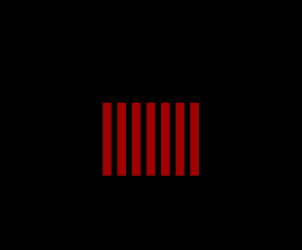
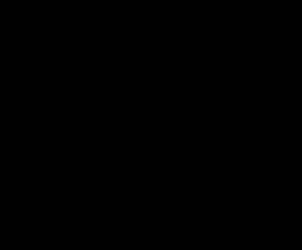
part: (150, 139) -> none

